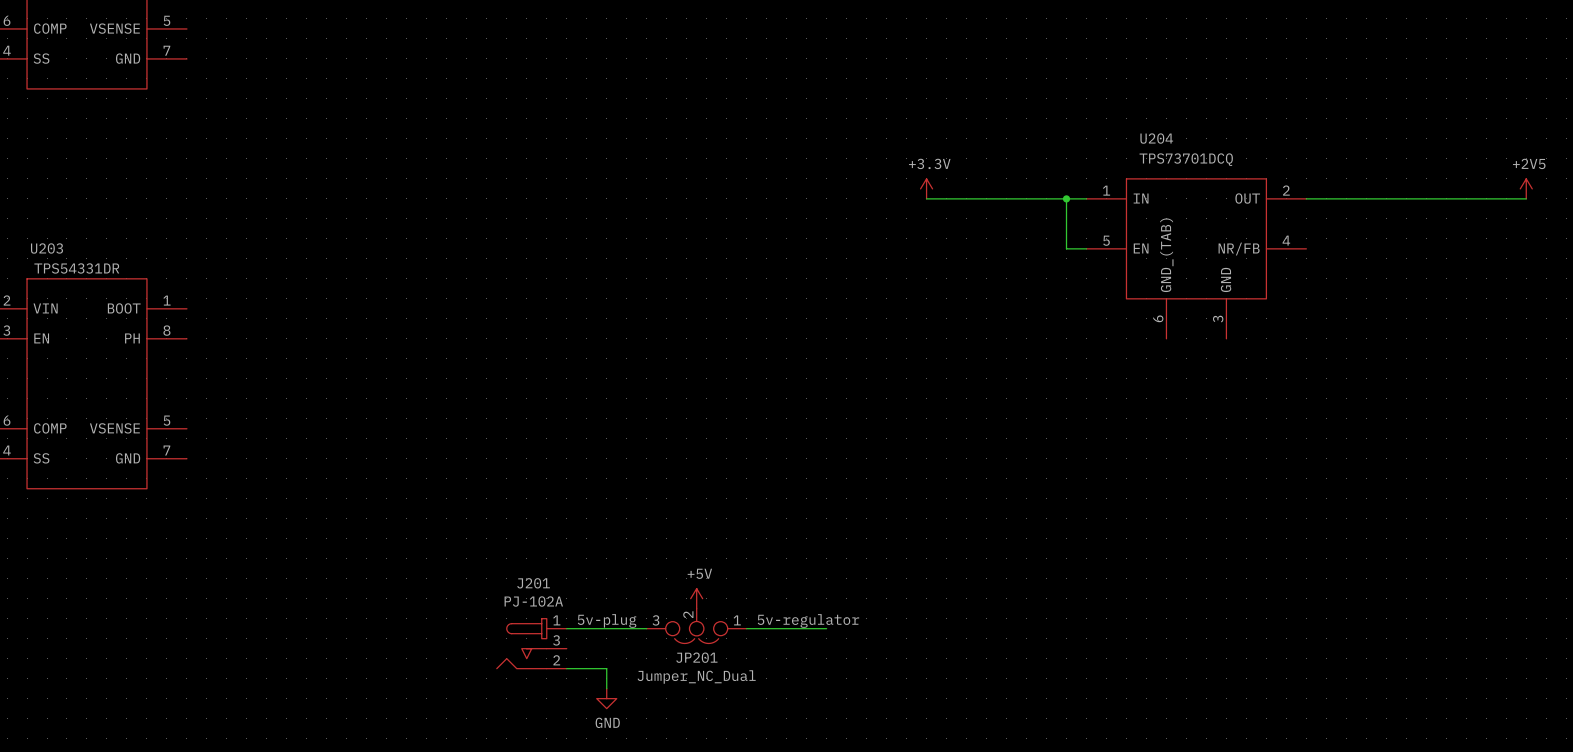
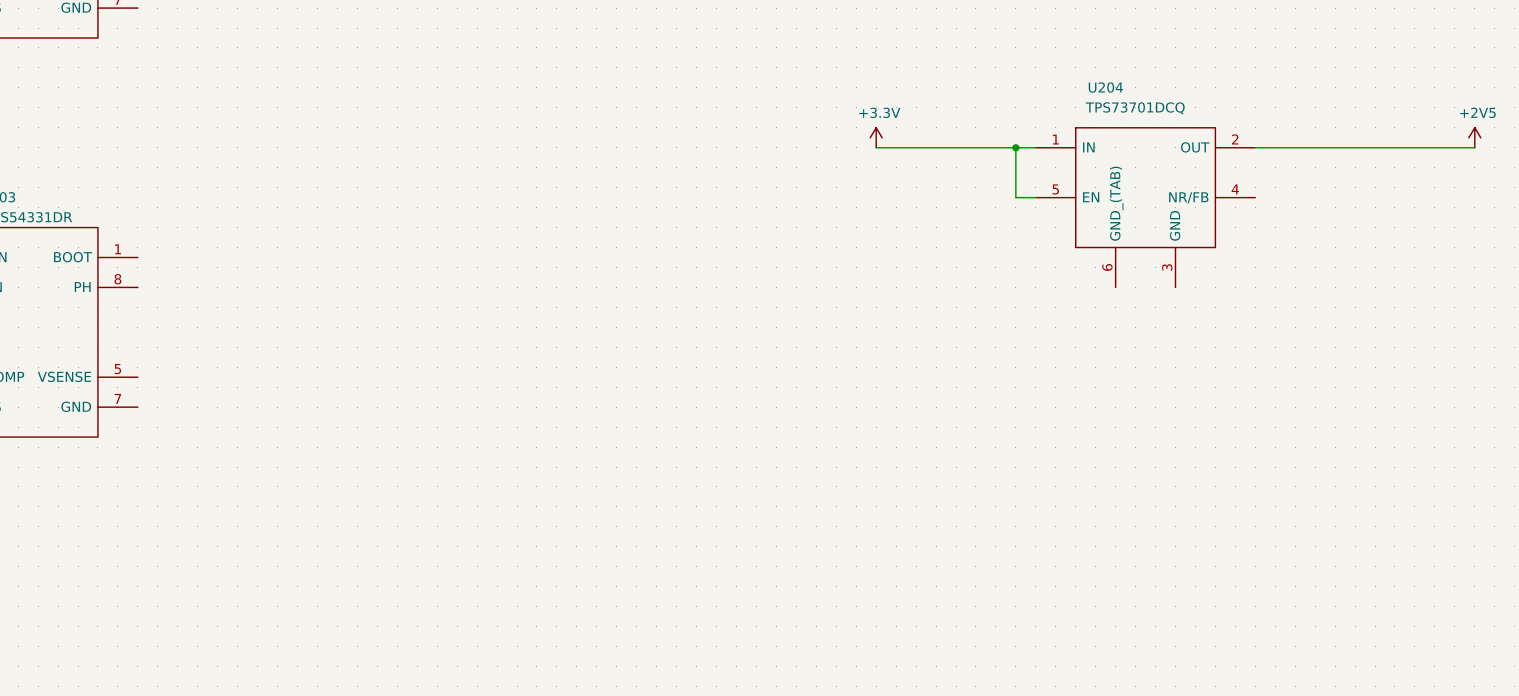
power symbol: +5V (696, 598) -> none
label: 5v-plug (607, 620) -> none
label: 5v-regulator (808, 620) -> none
JP201: Jumper_NC_Dual (696, 626) -> none
wire: (566, 628) (646, 628) -> none
wire: (746, 628) (826, 628) -> none
J201: PJ-102A (531, 643) -> none
wire: (566, 668) (606, 668) (606, 688) -> none
power symbol: GND (606, 698) -> none

